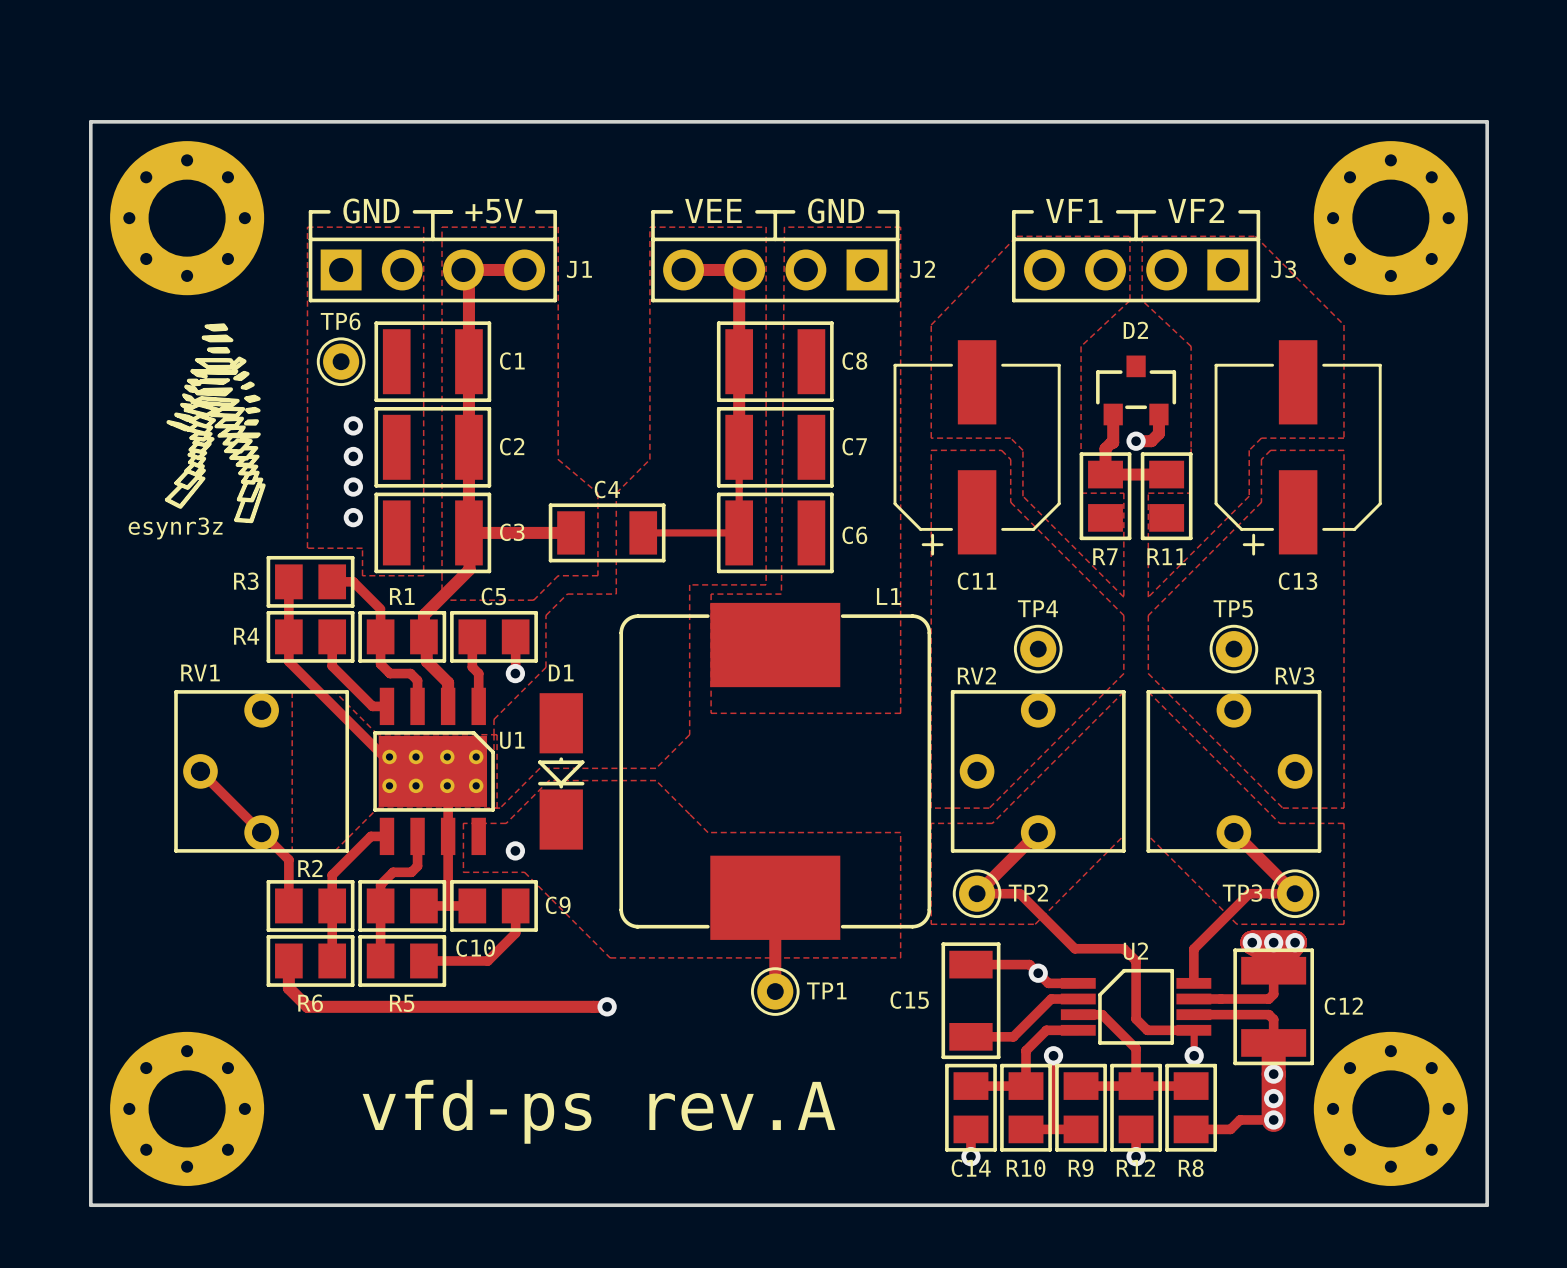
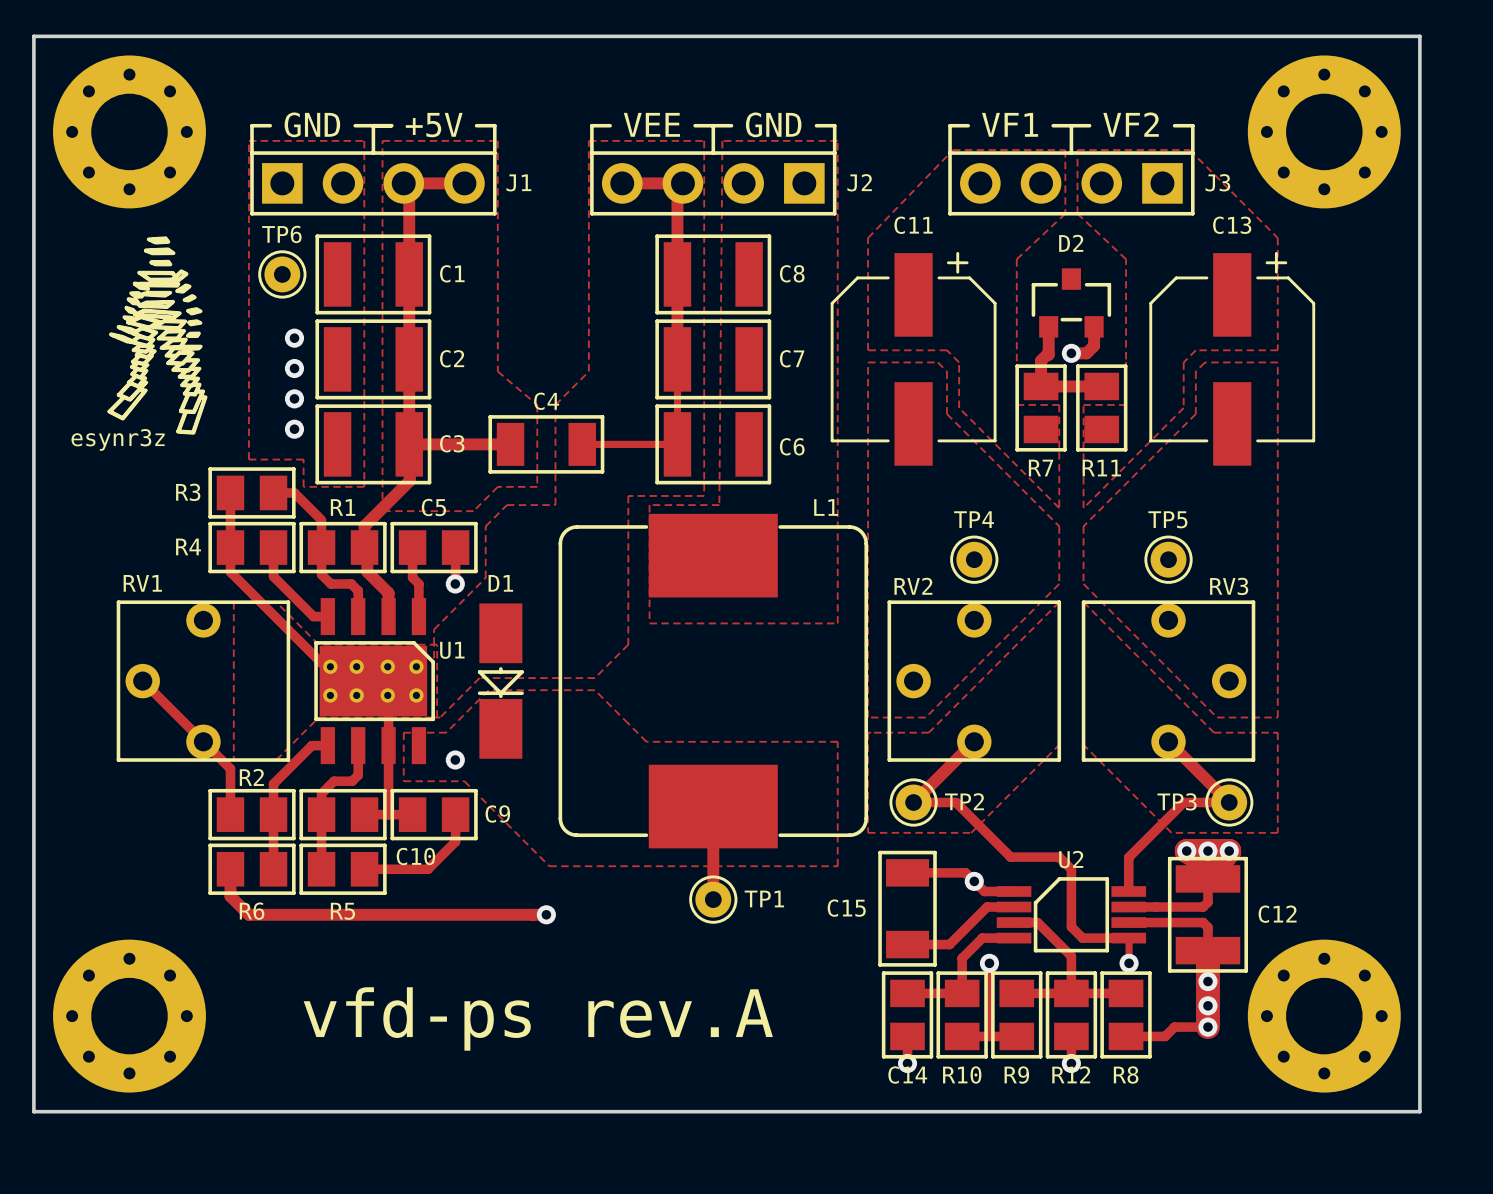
C11 footprint: [893, 340, 1061, 556] -> [830, 251, 997, 466]
C13 rotation: 0° (1298, 447) -> 180° (1232, 358)
C11 name position: C11 (977, 581) -> C11 (913, 225)

